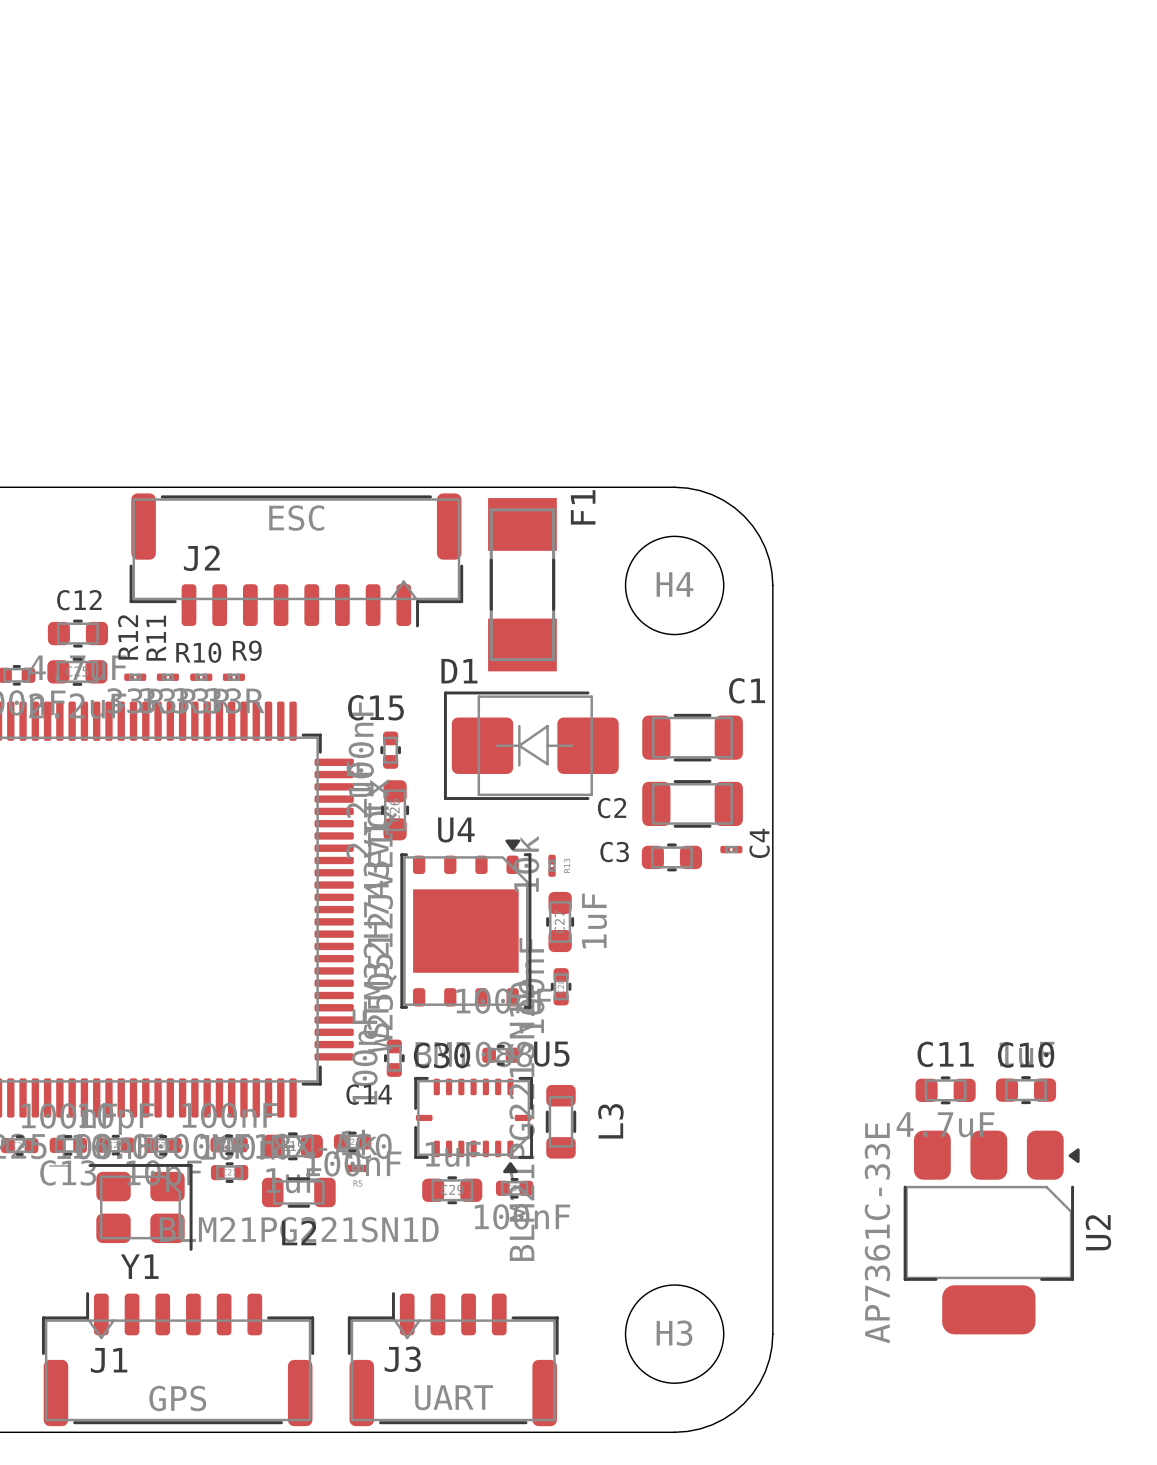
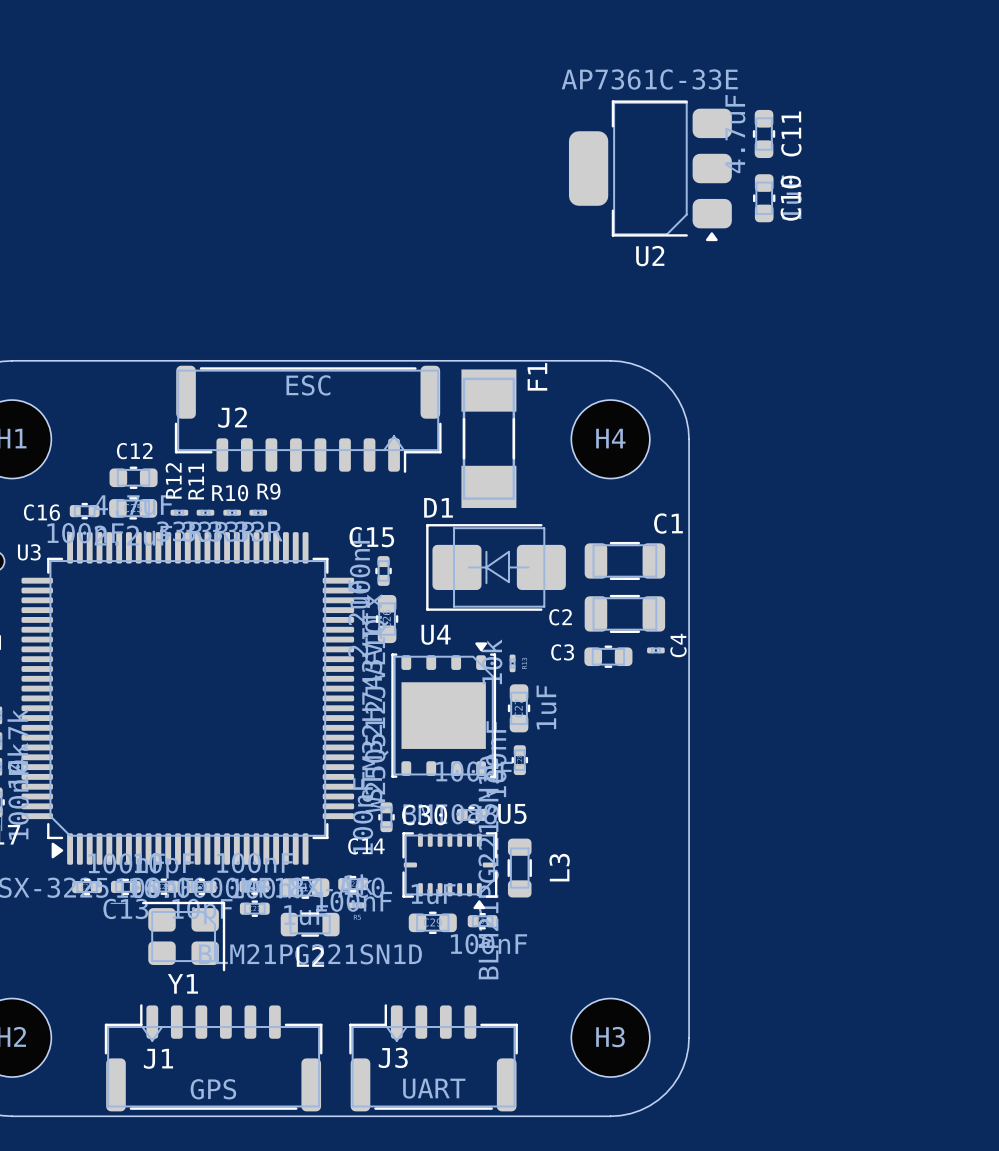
C11 rotation: 0° (945, 1090) -> 90° clockwise (764, 133)
C11 position: (945, 1090) -> (764, 133)
C10 rotation: 0° (1026, 1090) -> 90° clockwise (764, 198)
C10 position: (1026, 1090) -> (764, 198)
U2 rotation: 0° (991, 1232) -> 90° clockwise (650, 170)
U2 position: (991, 1232) -> (650, 170)

